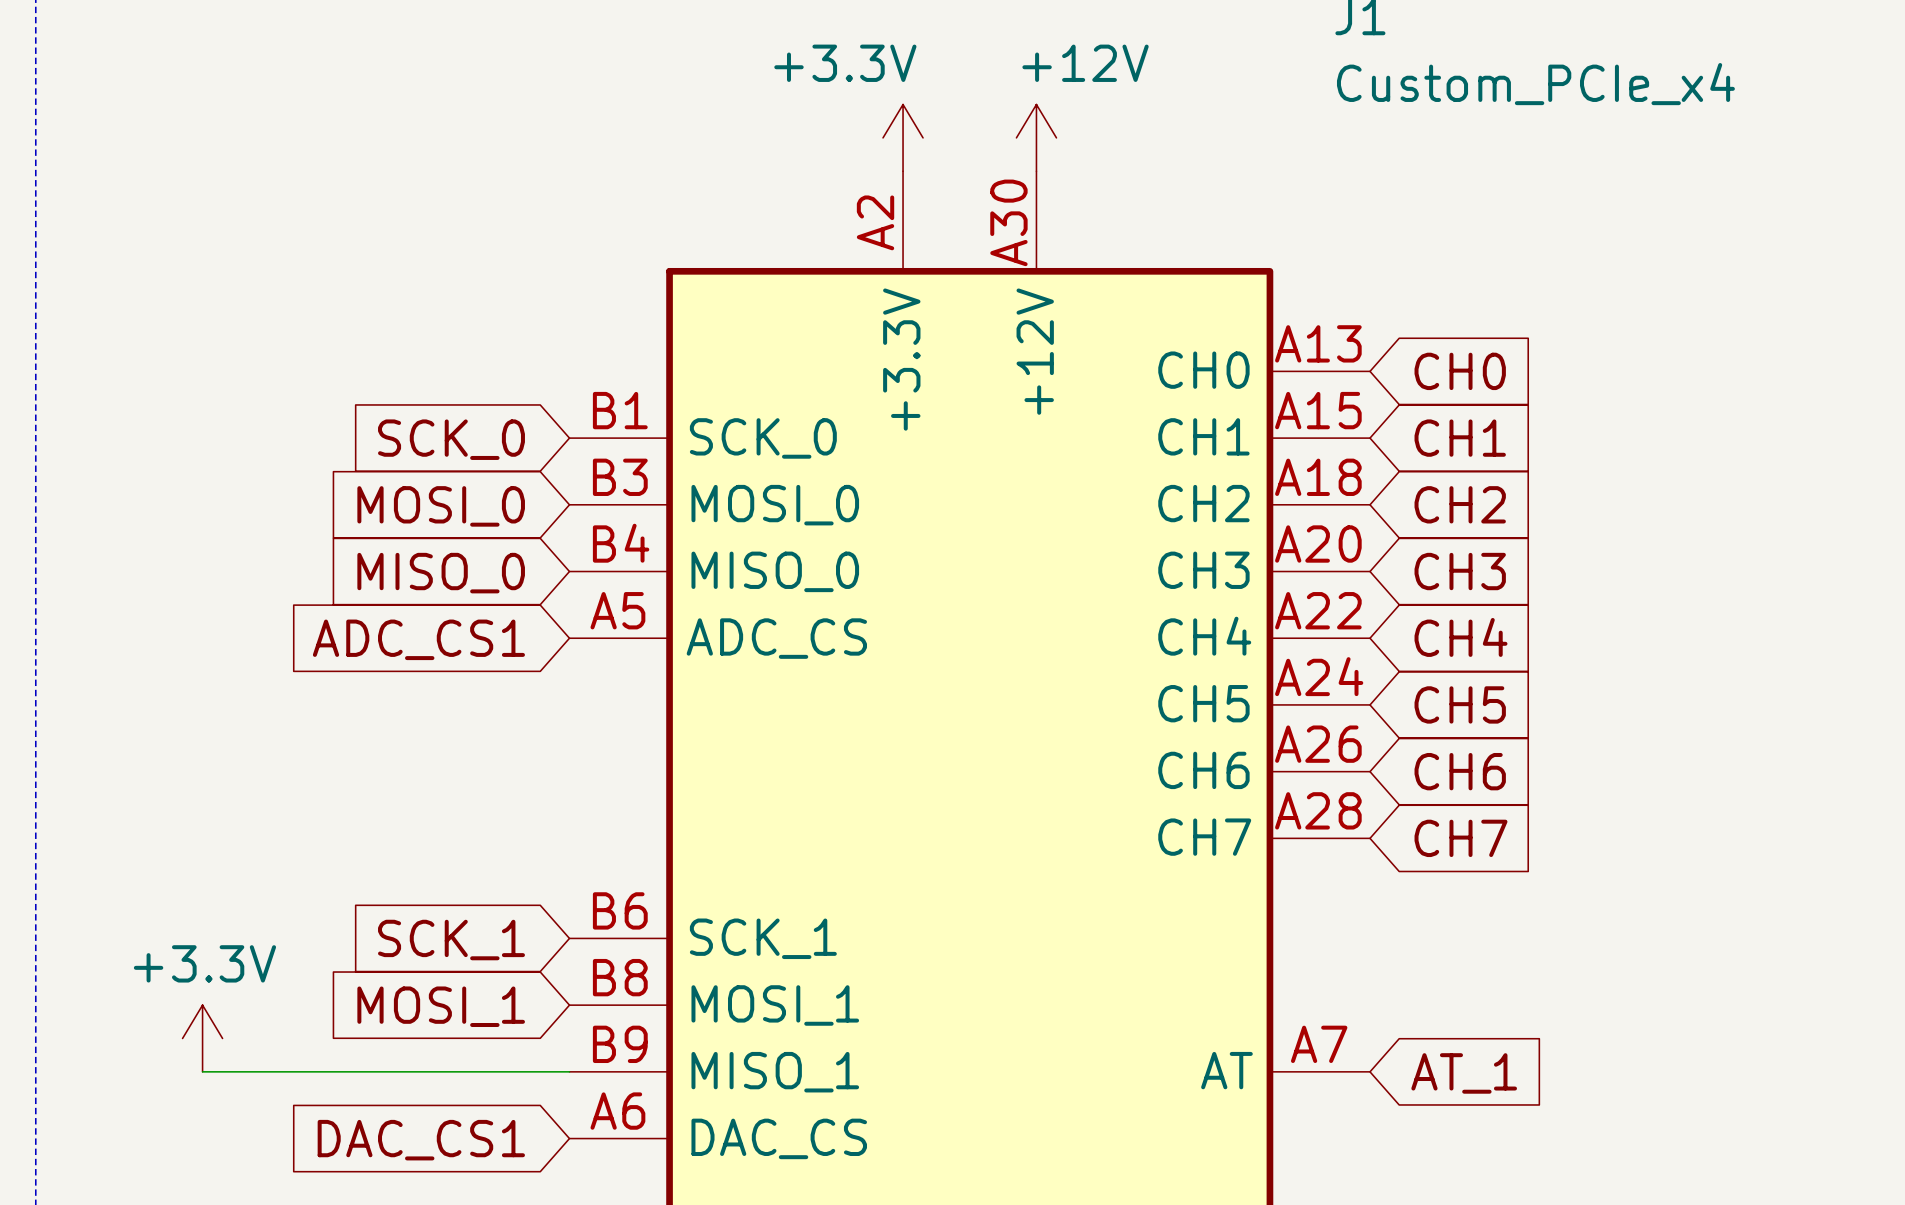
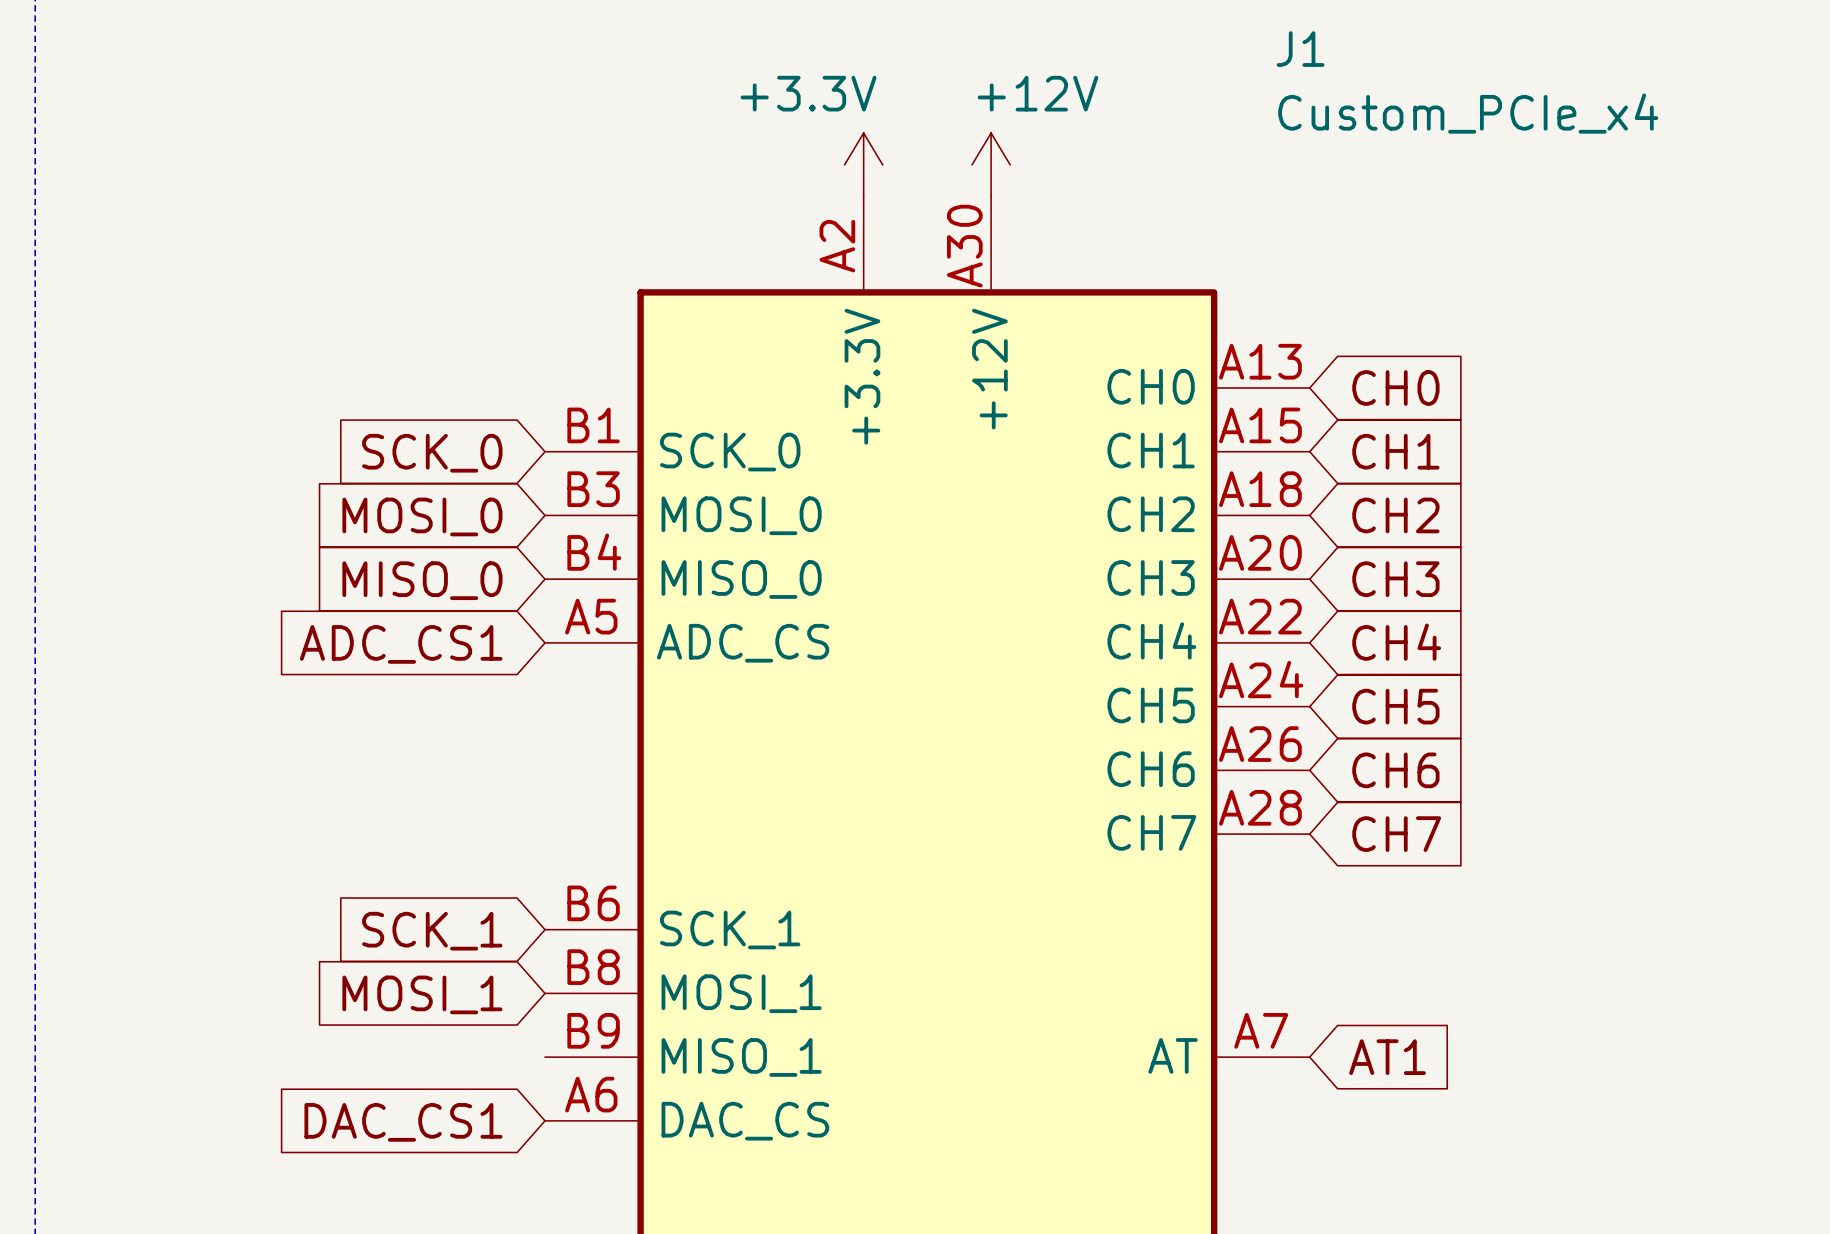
power symbol: +3.3V (202, 1038) -> none
wire: (202, 1071) (569, 1071) -> none
global label: AT_1 (1464, 1073) -> AT1 (1387, 1057)

